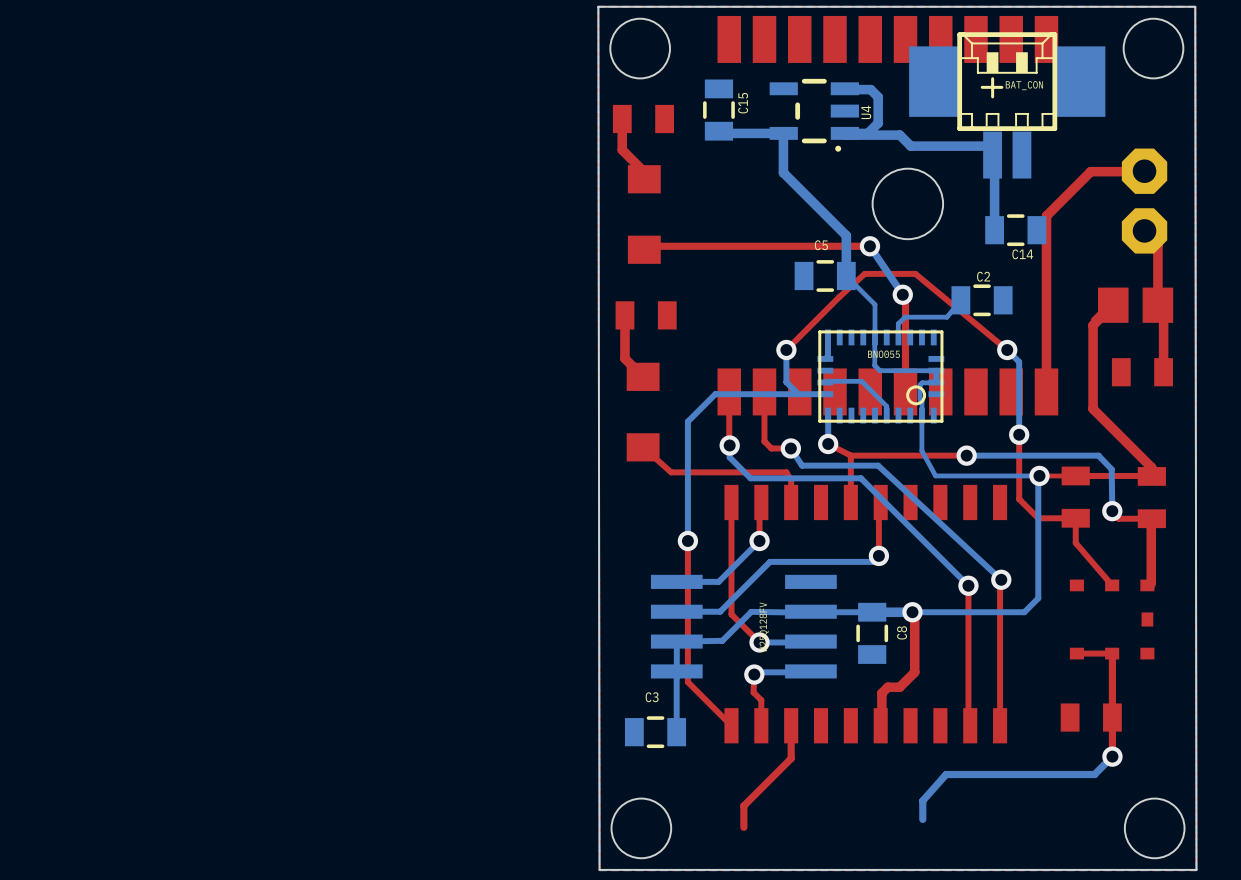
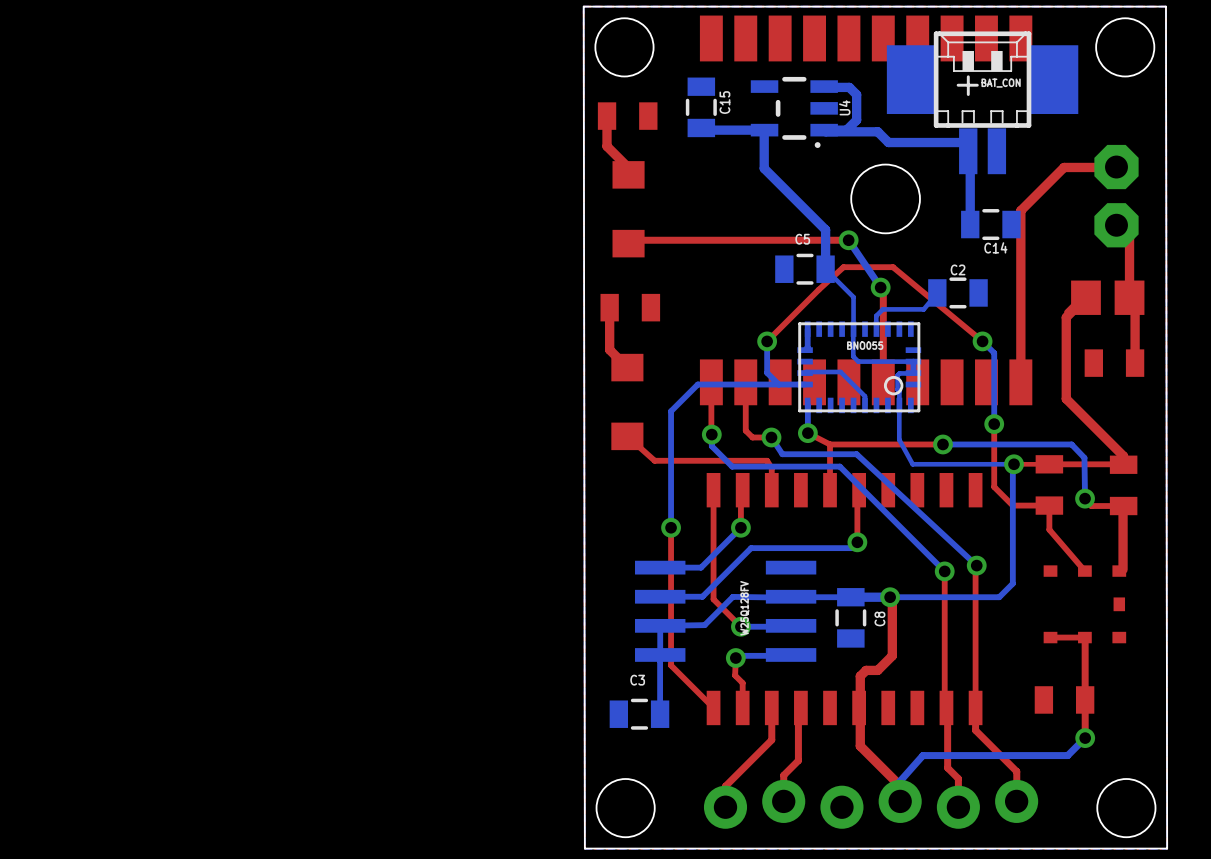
top track: none -> (800, 707) (798, 710) (798, 760) (783, 775) (783, 801)
top track: none -> (859, 707) (860, 746) (900, 785) (900, 801)
top track: none -> (946, 707) (947, 767) (958, 778) (958, 807)
top track: none -> (975, 707) (975, 730) (1016, 771) (1016, 801)
part: none -> (871, 804)

